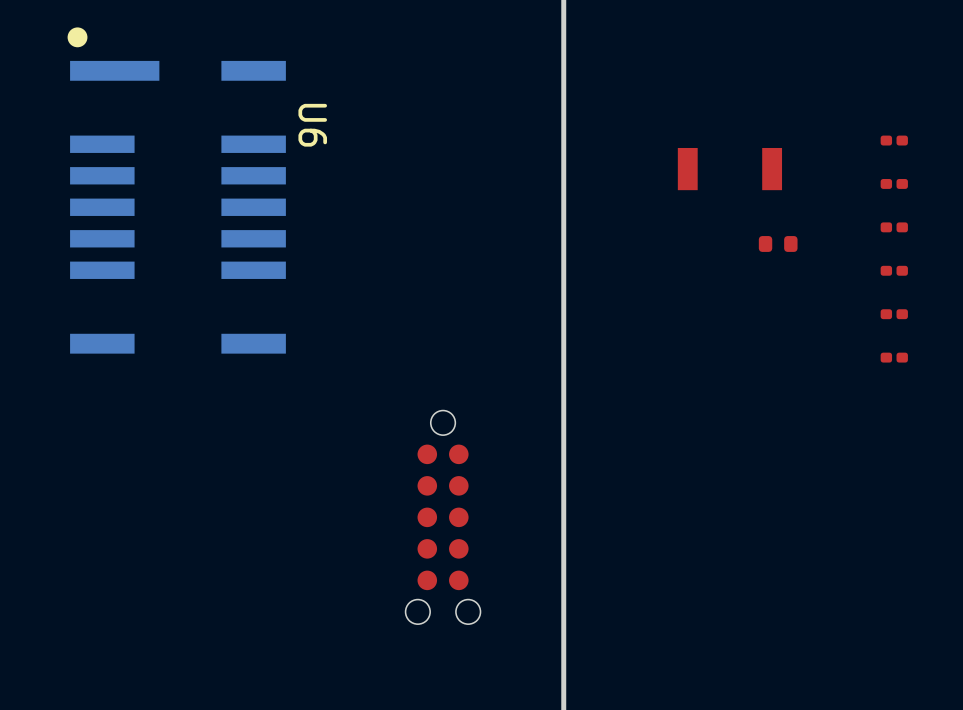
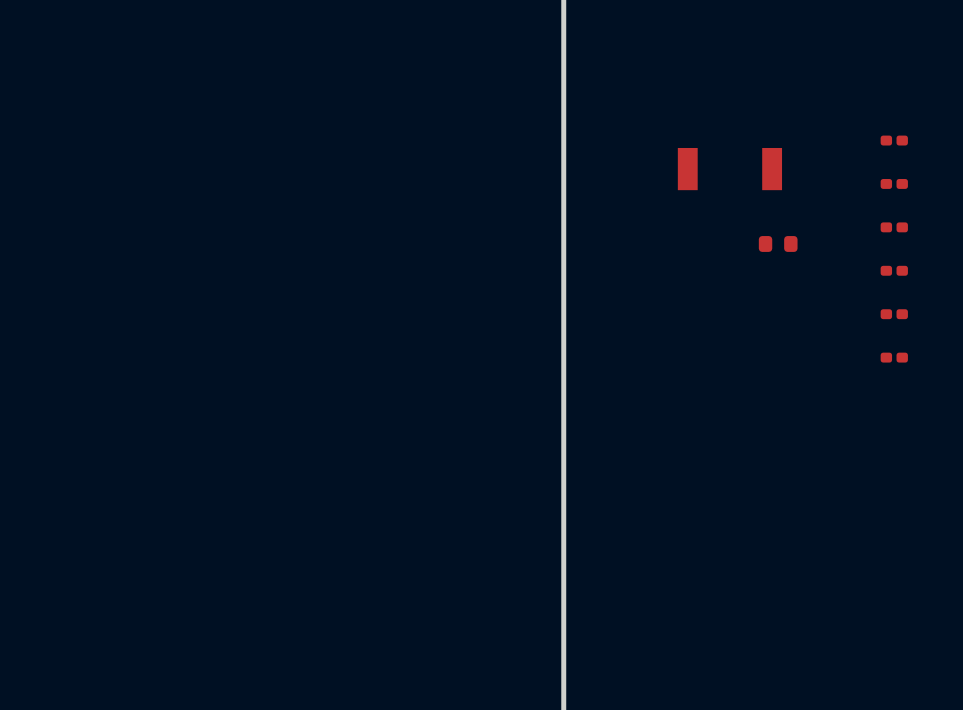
U6: (176, 190) -> none
part: (443, 517) -> none

